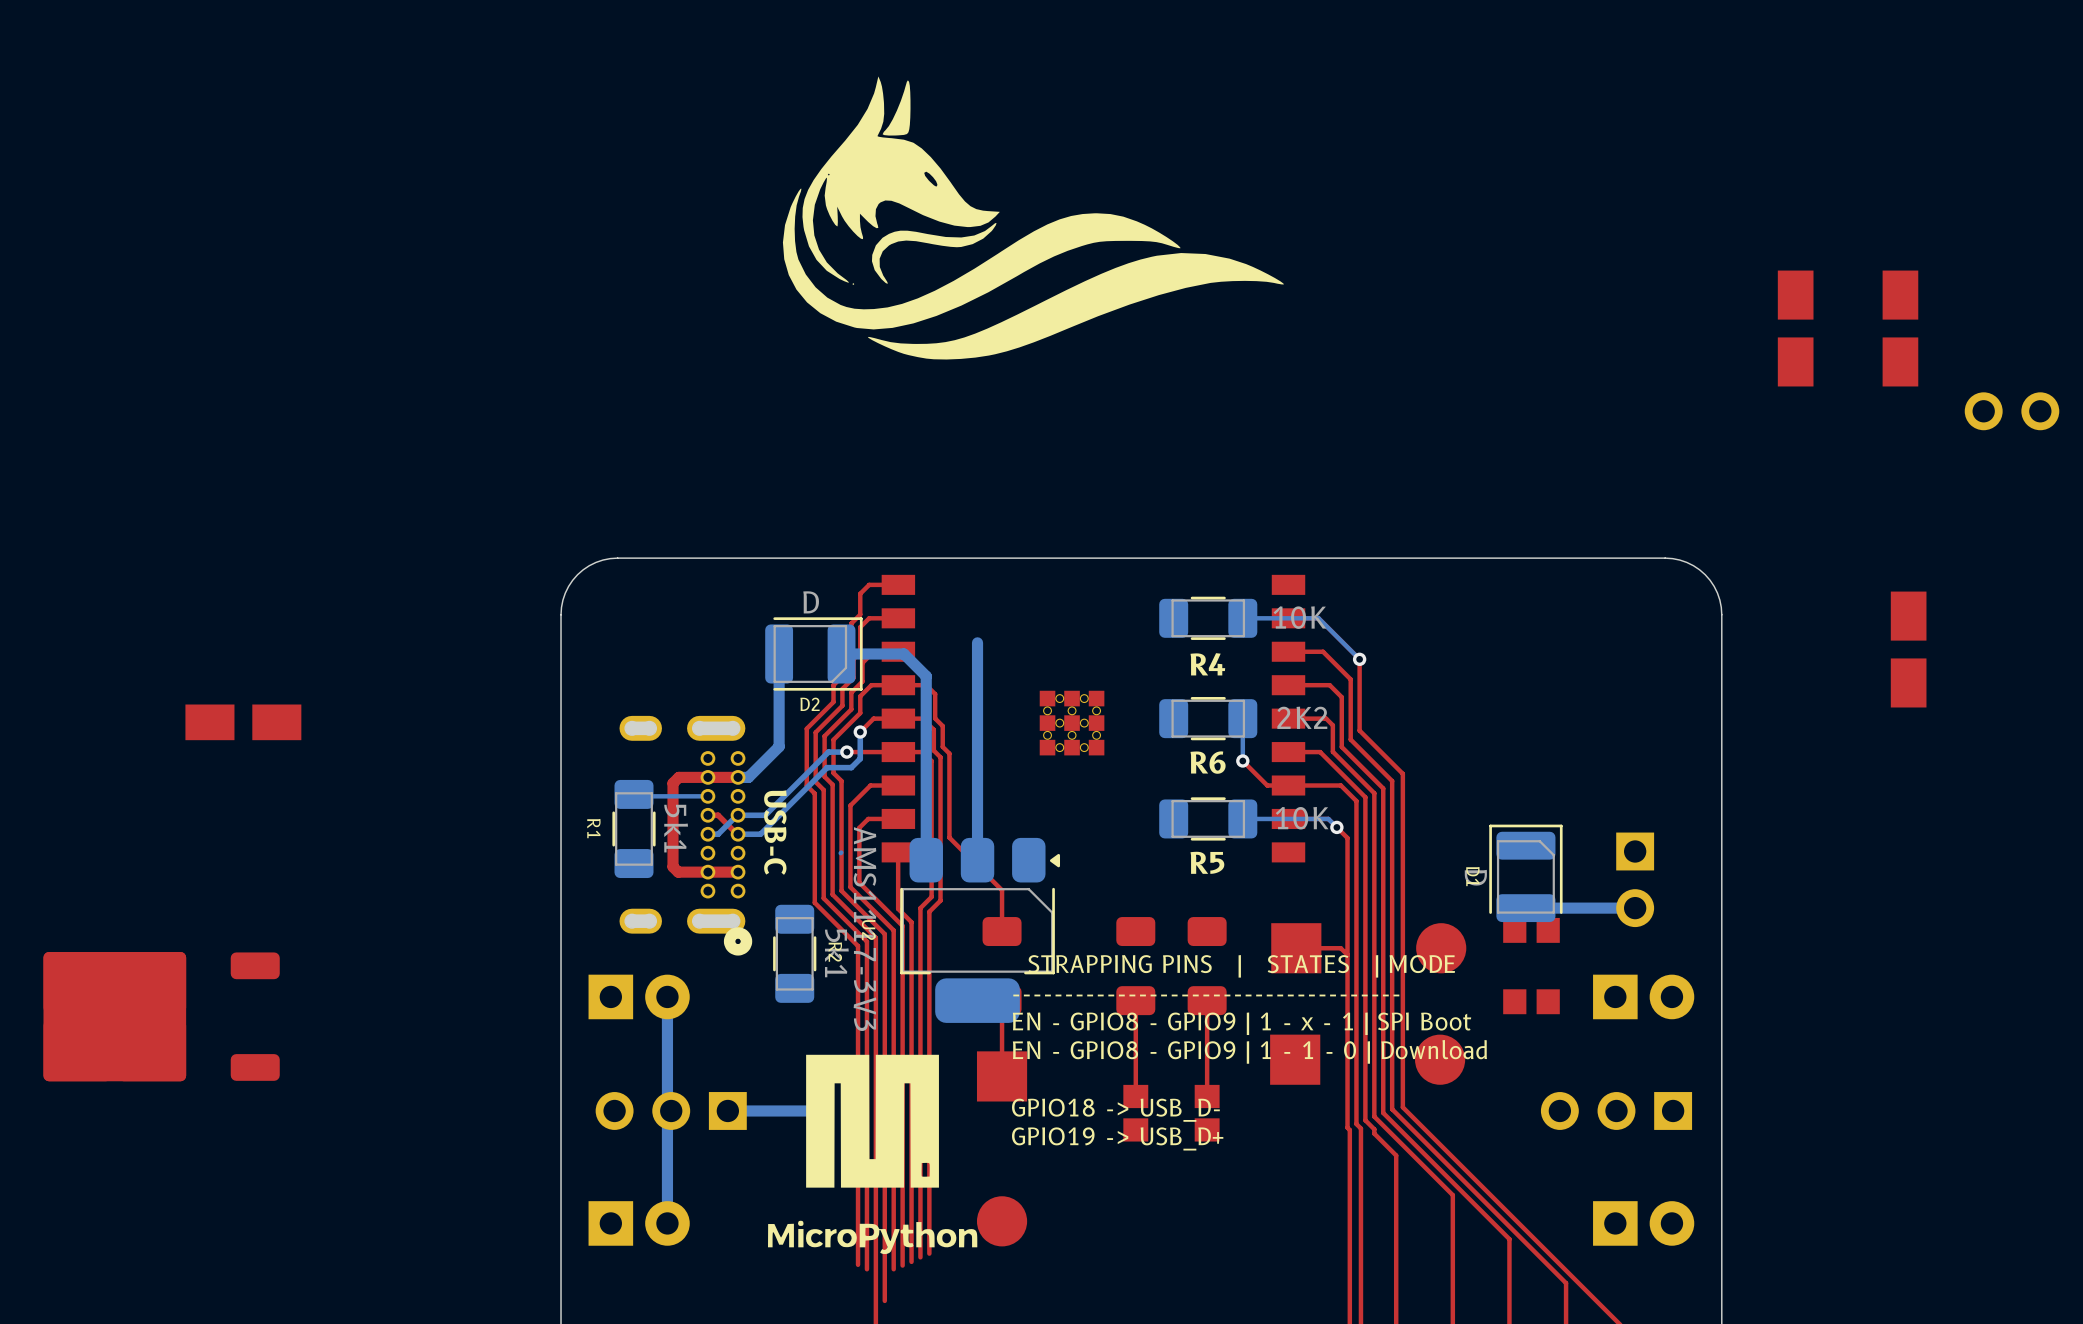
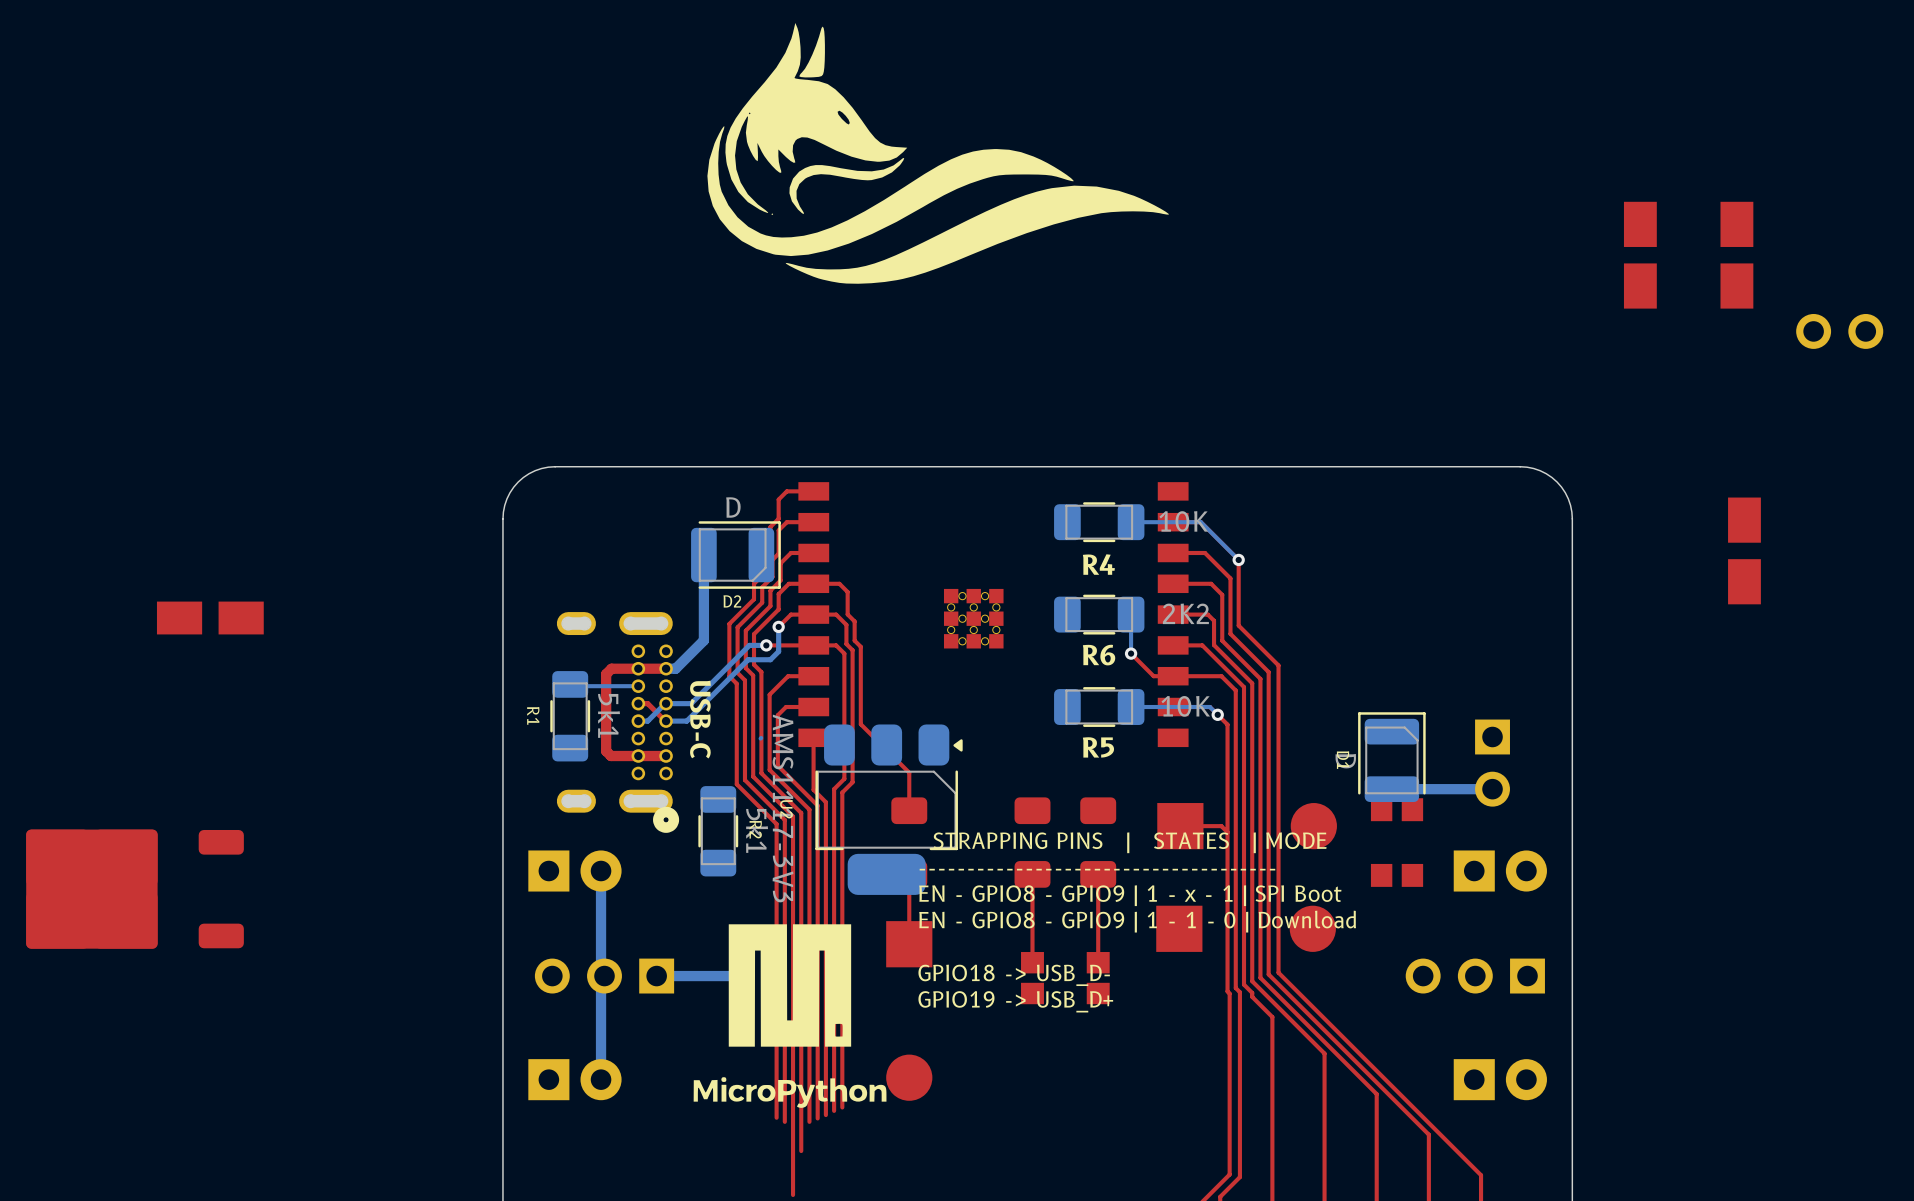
bottom track: (977, 642) (977, 860) -> none
bottom track: (841, 653) (903, 653) (926, 676) (926, 860) -> none

